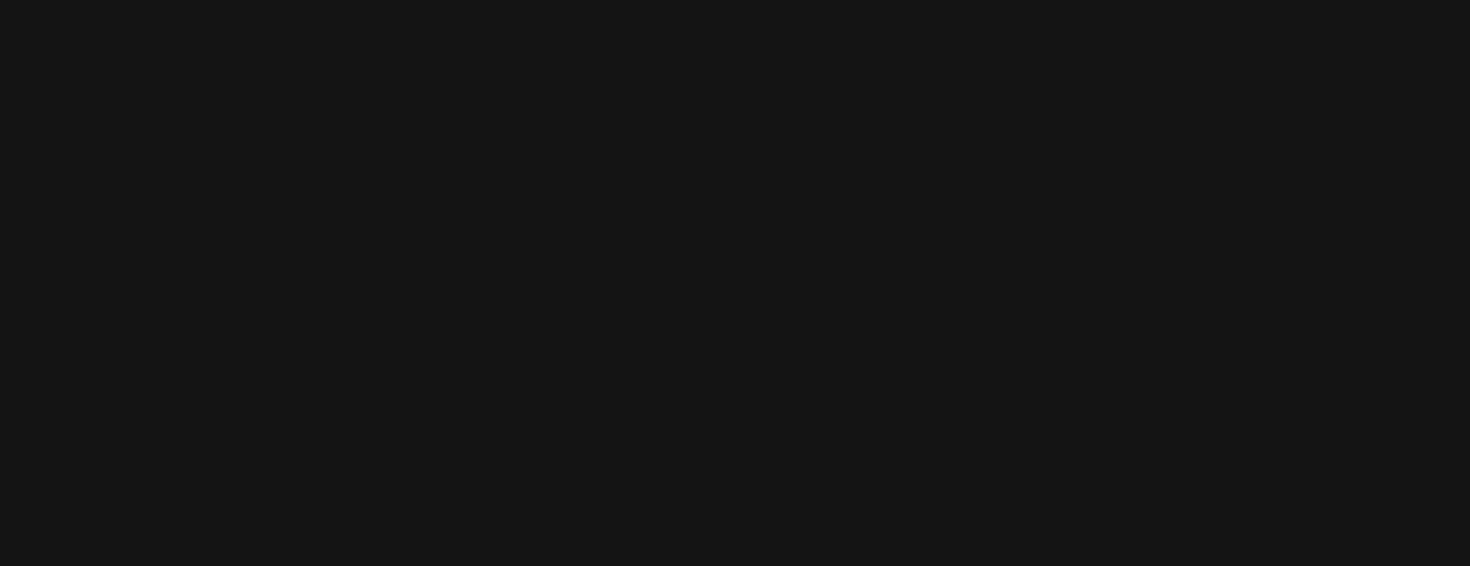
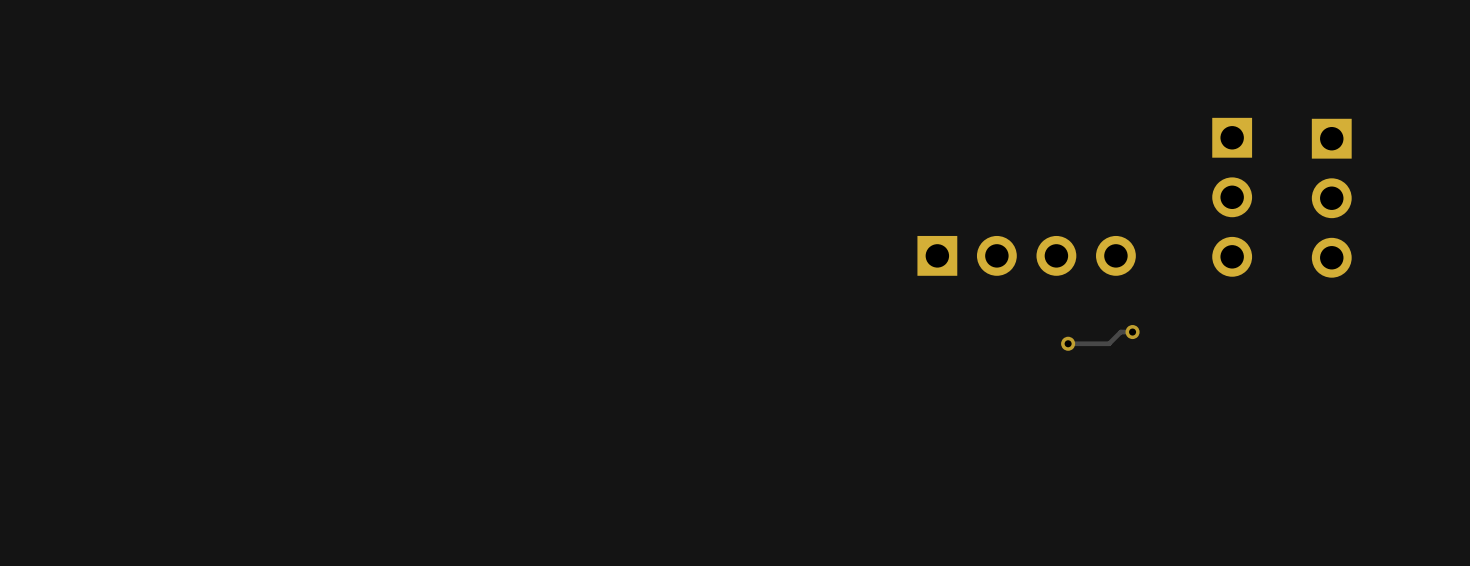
part: none -> (1232, 197)
part: none -> (1331, 198)
part: none -> (1026, 255)
track: none -> (1132, 332) (1120, 332) (1109, 343) (1068, 343)
via: none -> (1132, 332)
via: none -> (1068, 343)

